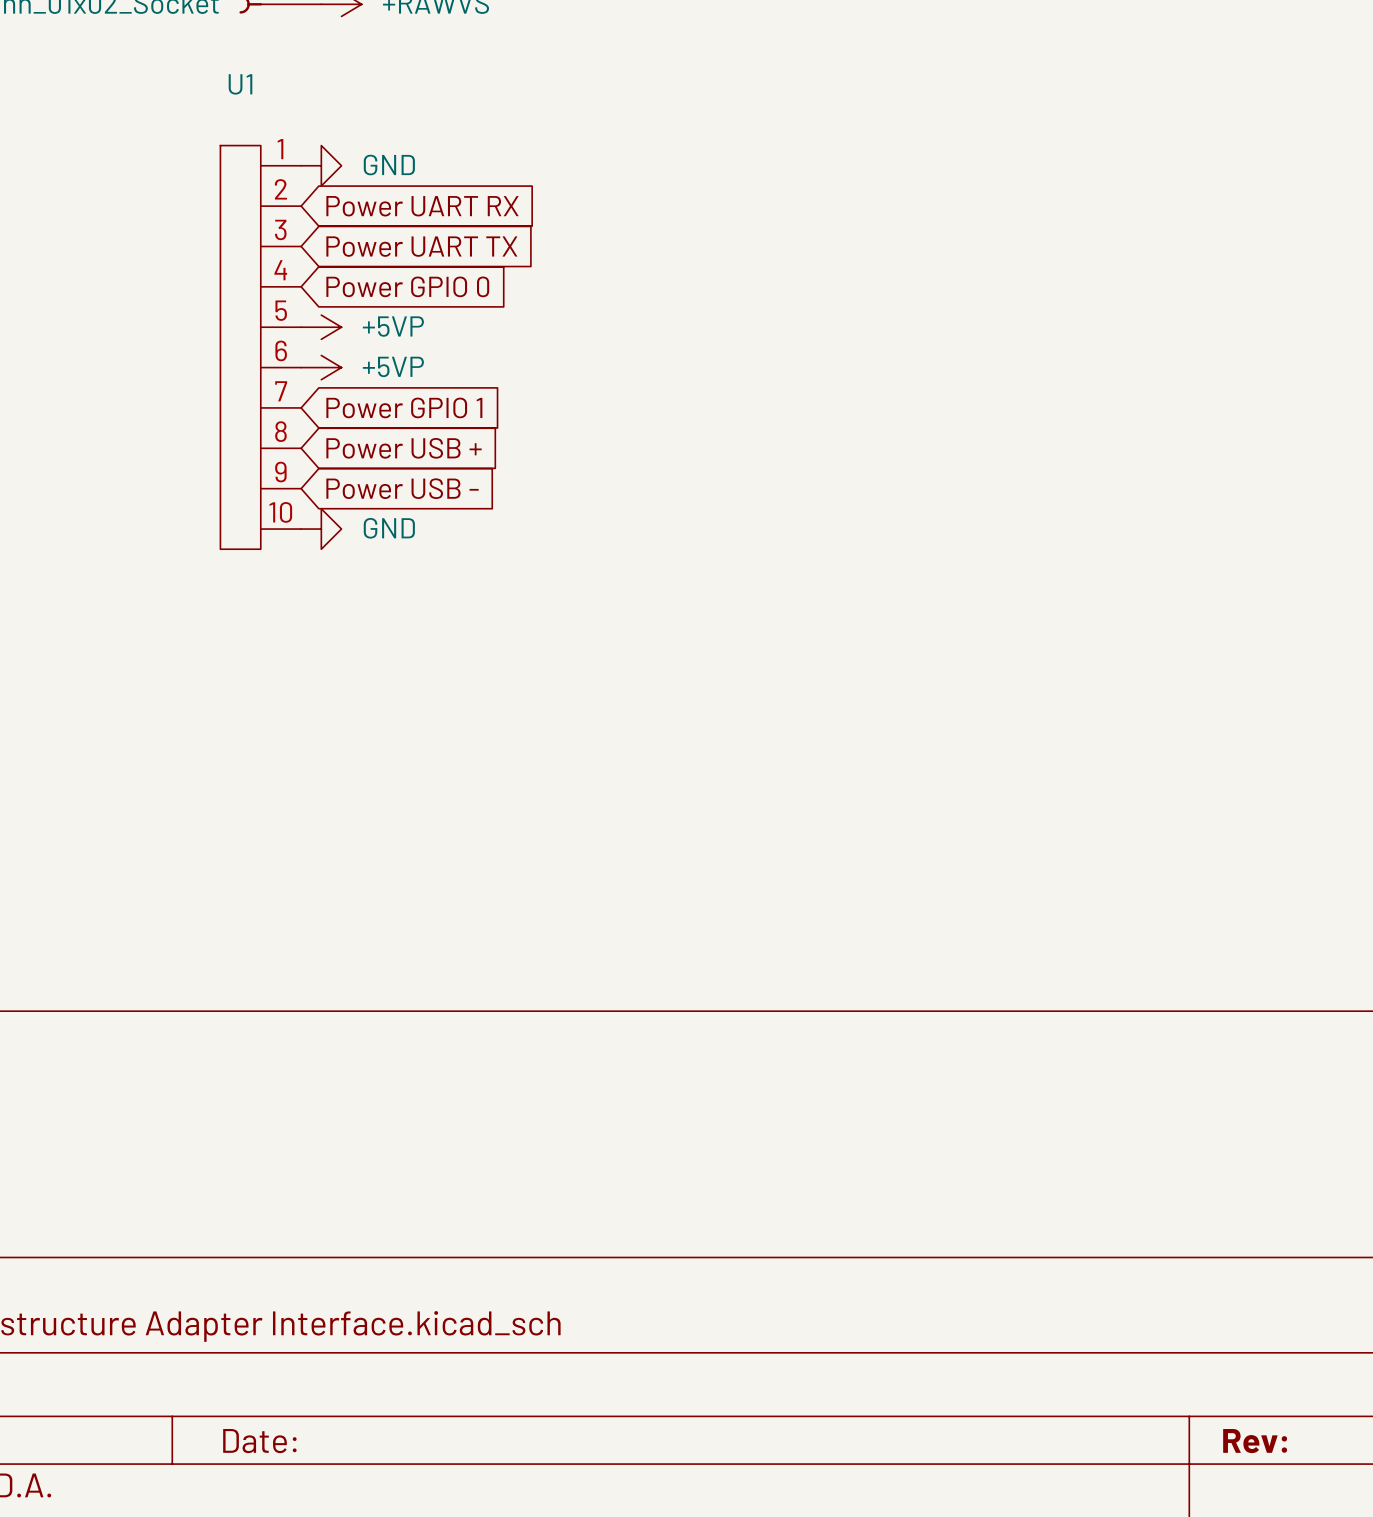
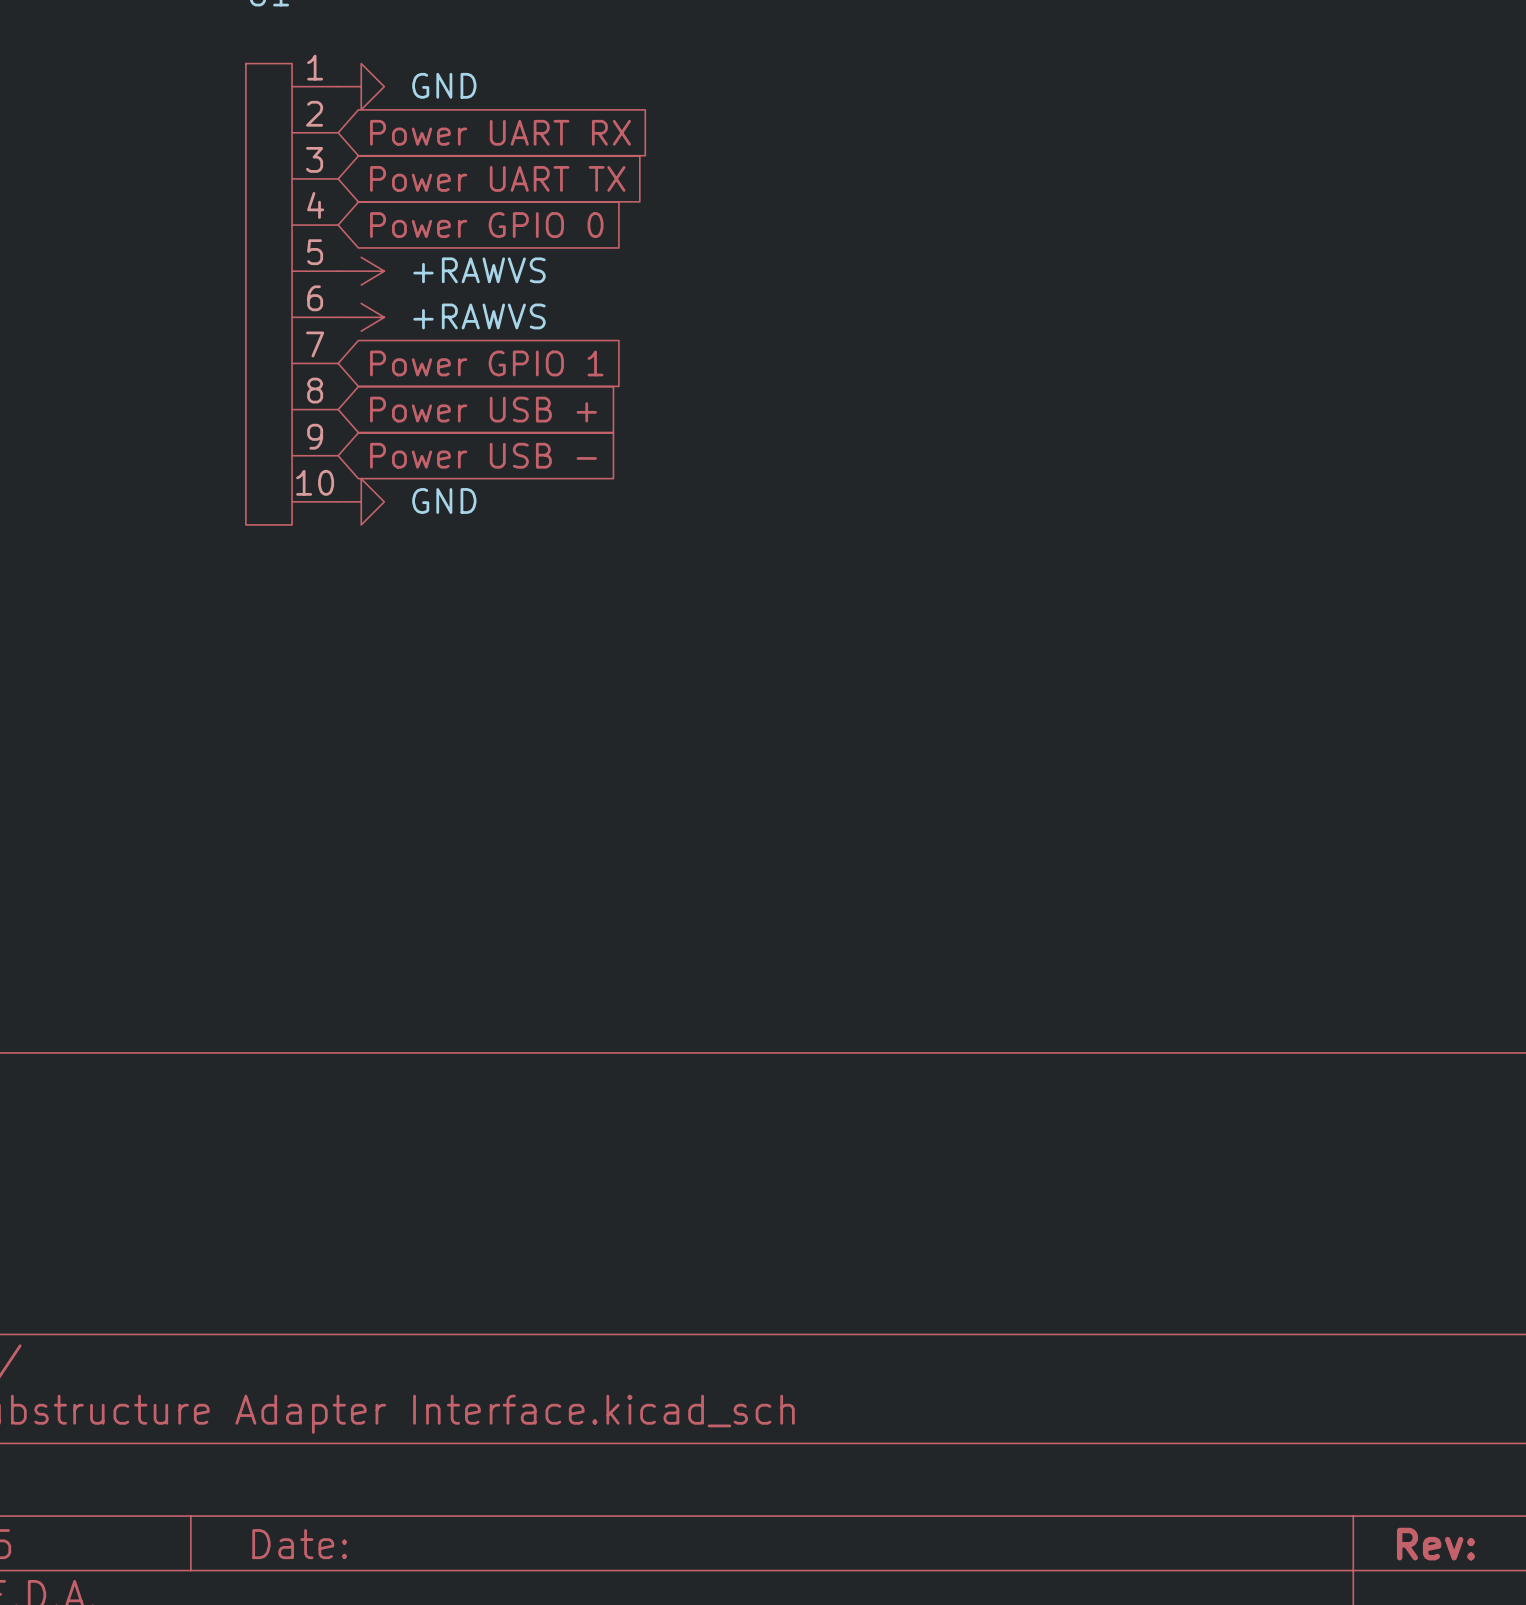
power symbol: +5VP (321, 327) -> +RAWVS (361, 271)
power symbol: +5VP (321, 367) -> +RAWVS (361, 317)

